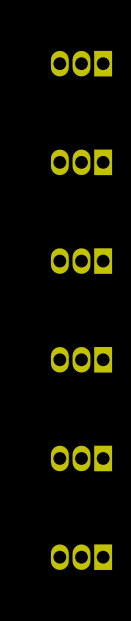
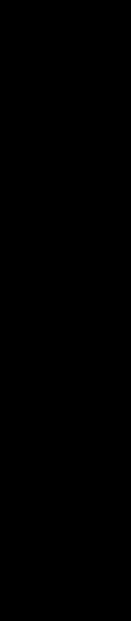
part: (81, 63) -> none
part: (81, 162) -> none
part: (81, 261) -> none
part: (81, 359) -> none
part: (81, 458) -> none
part: (81, 557) -> none

